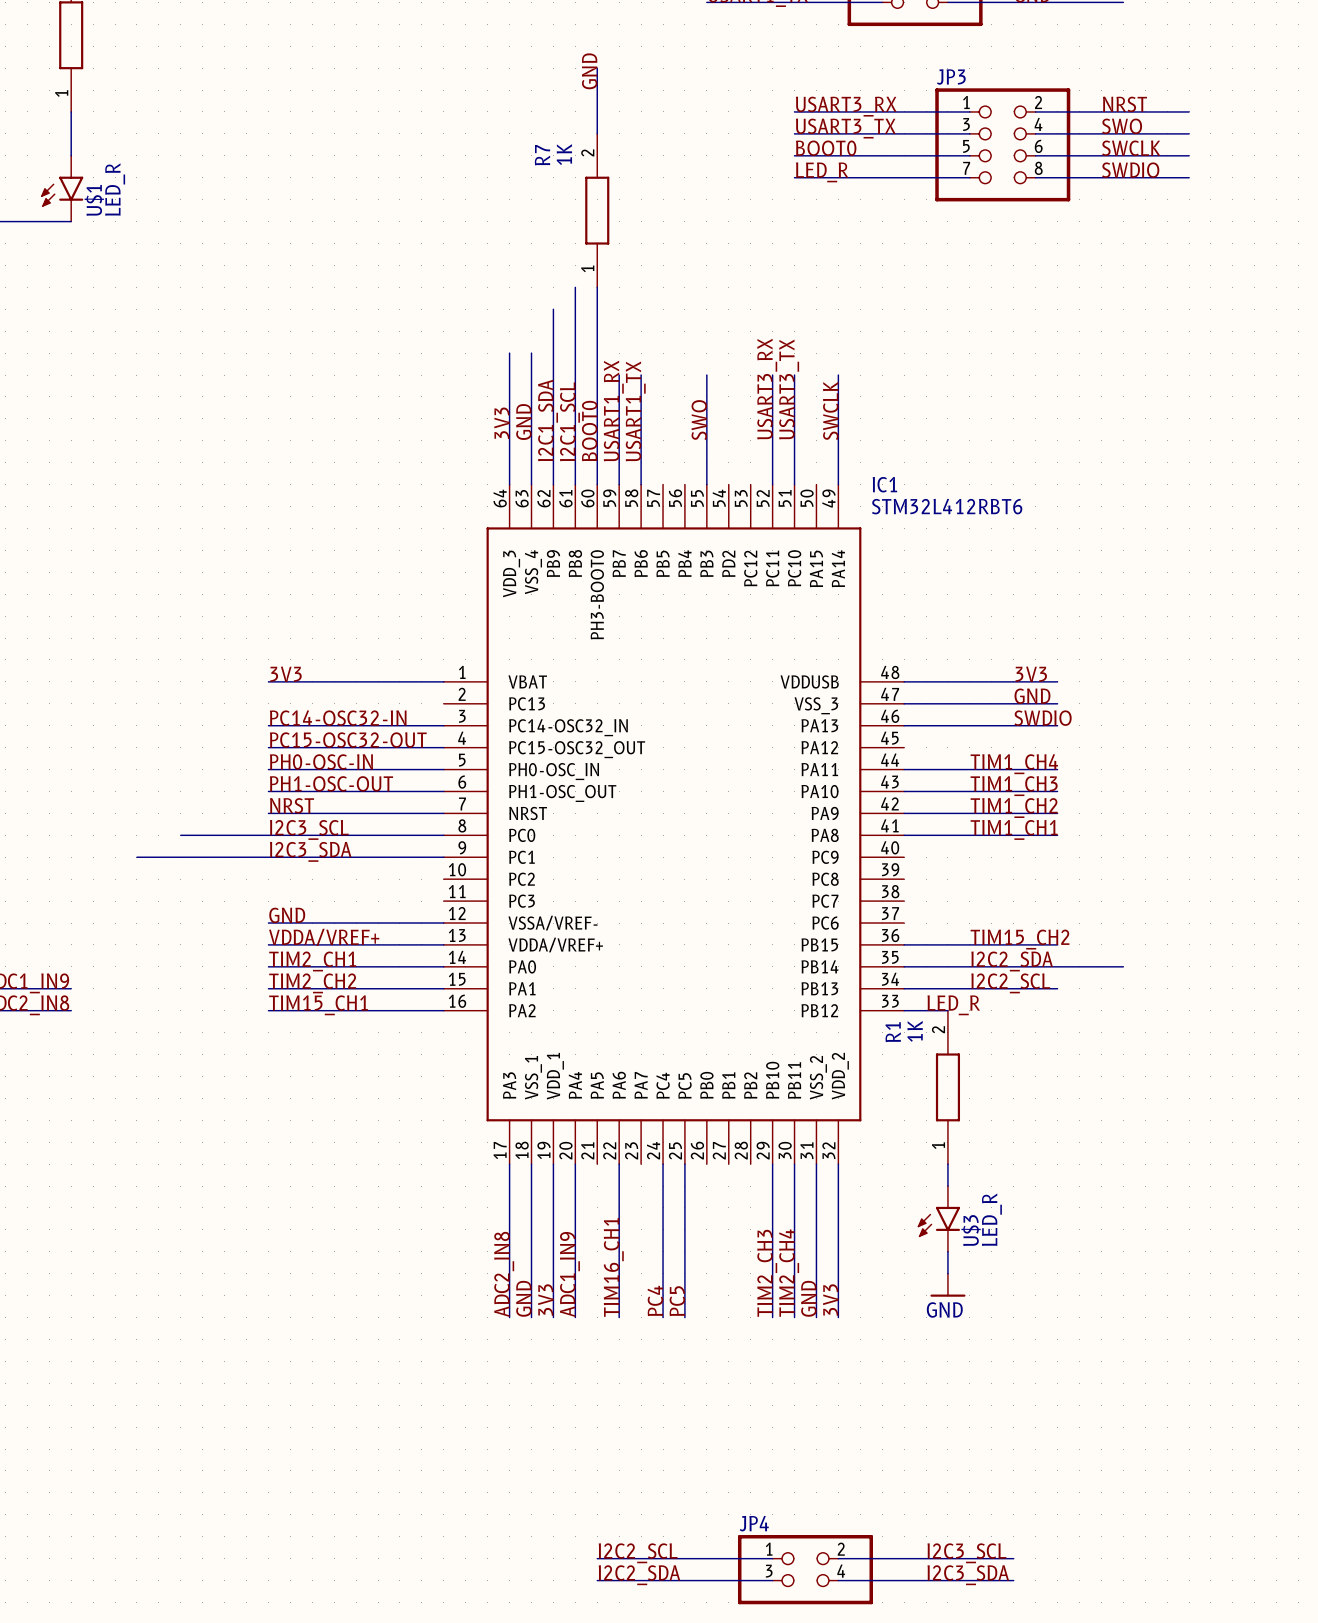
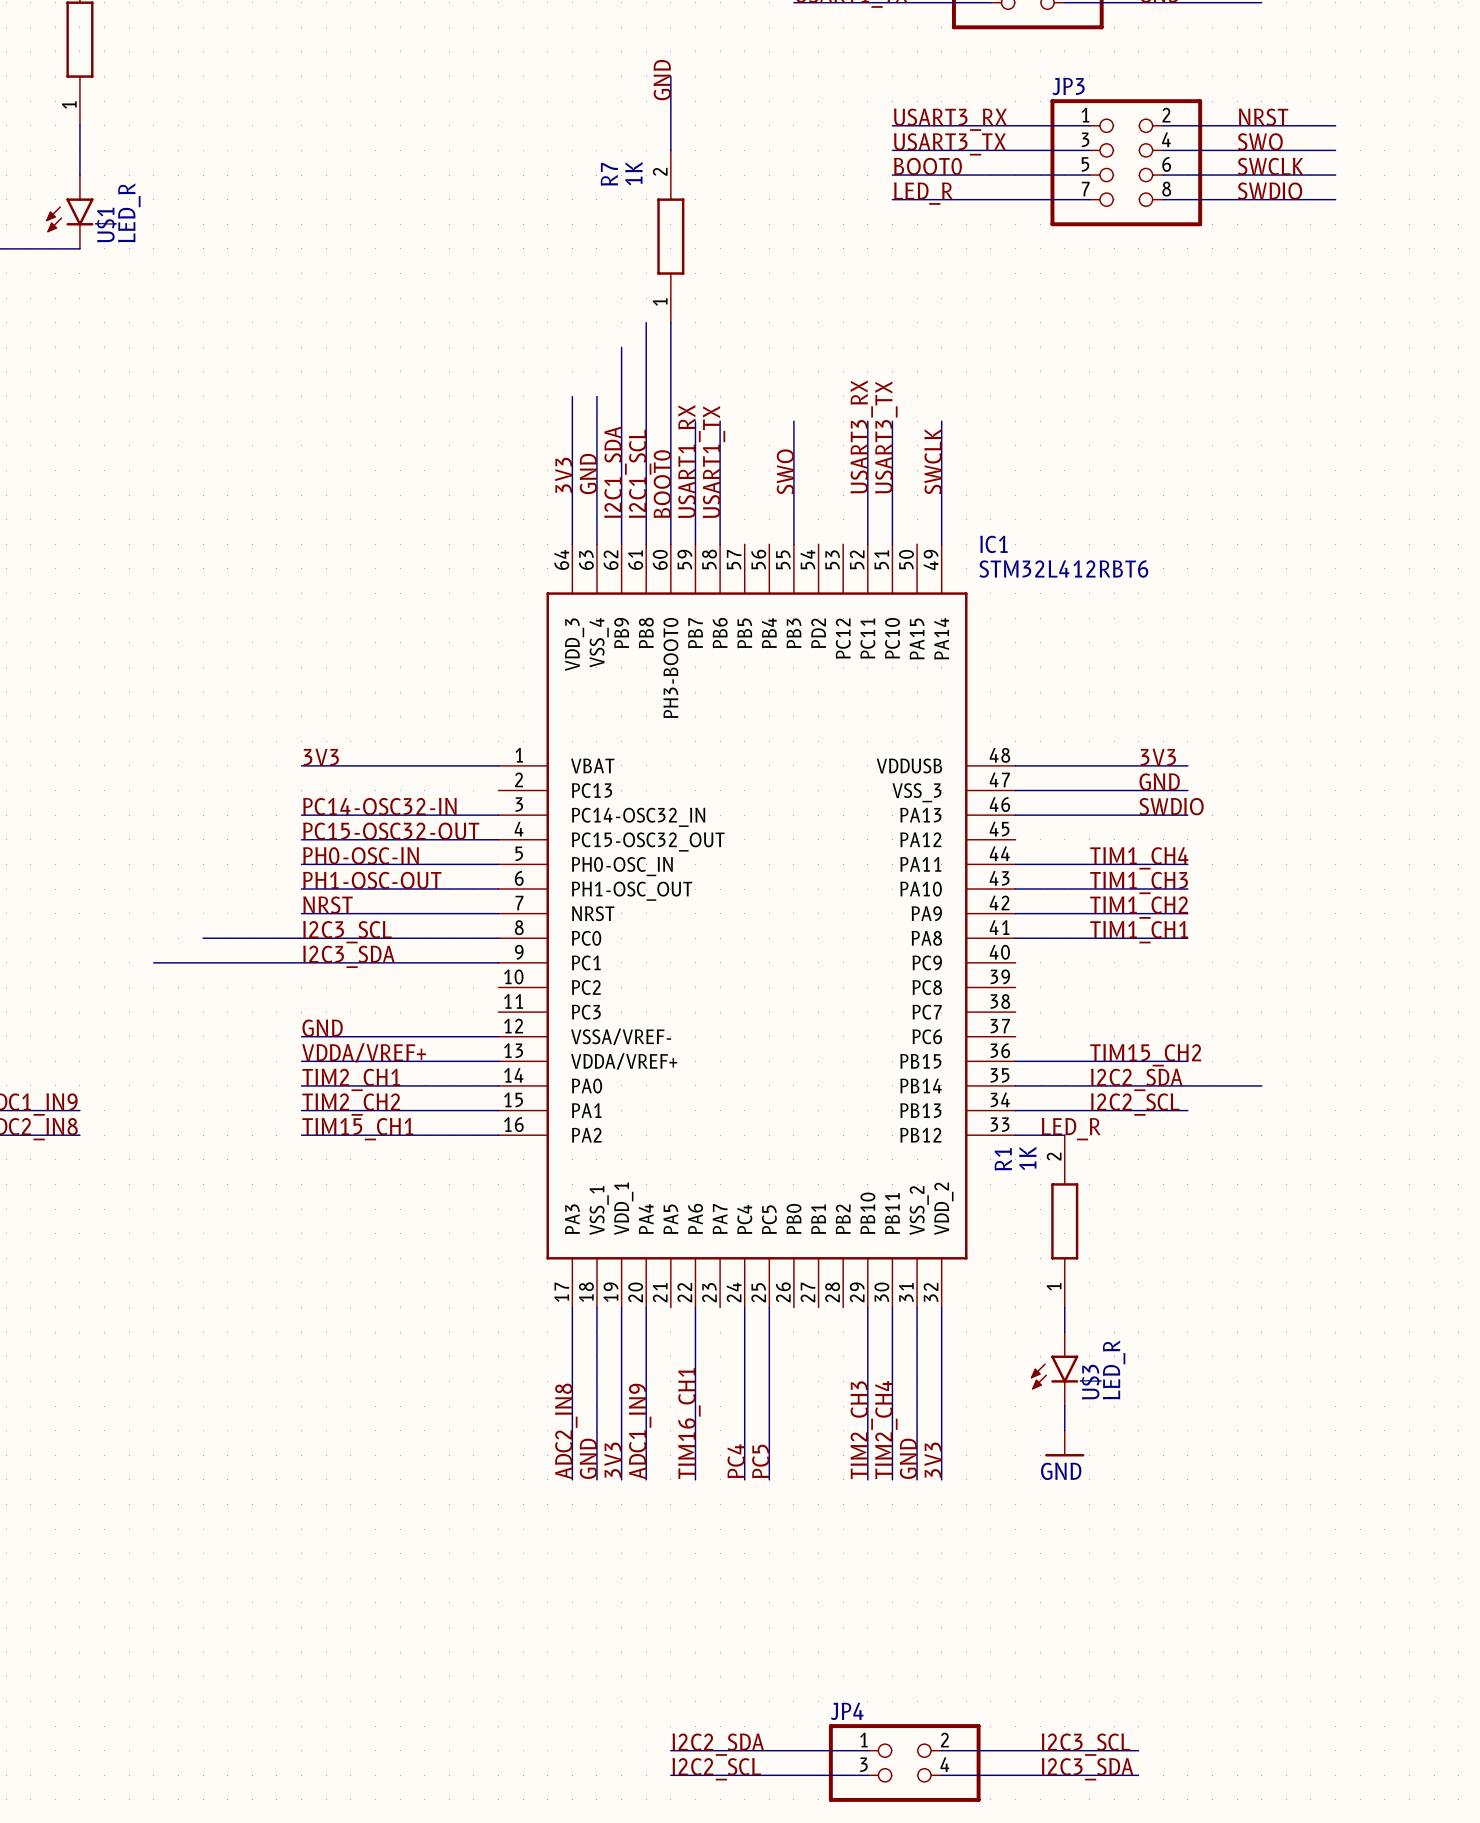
label: I2C2_SCL (638, 1553) -> I2C2_SDA (718, 1744)
label: I2C2_SDA (639, 1575) -> I2C2_SCL (716, 1769)

